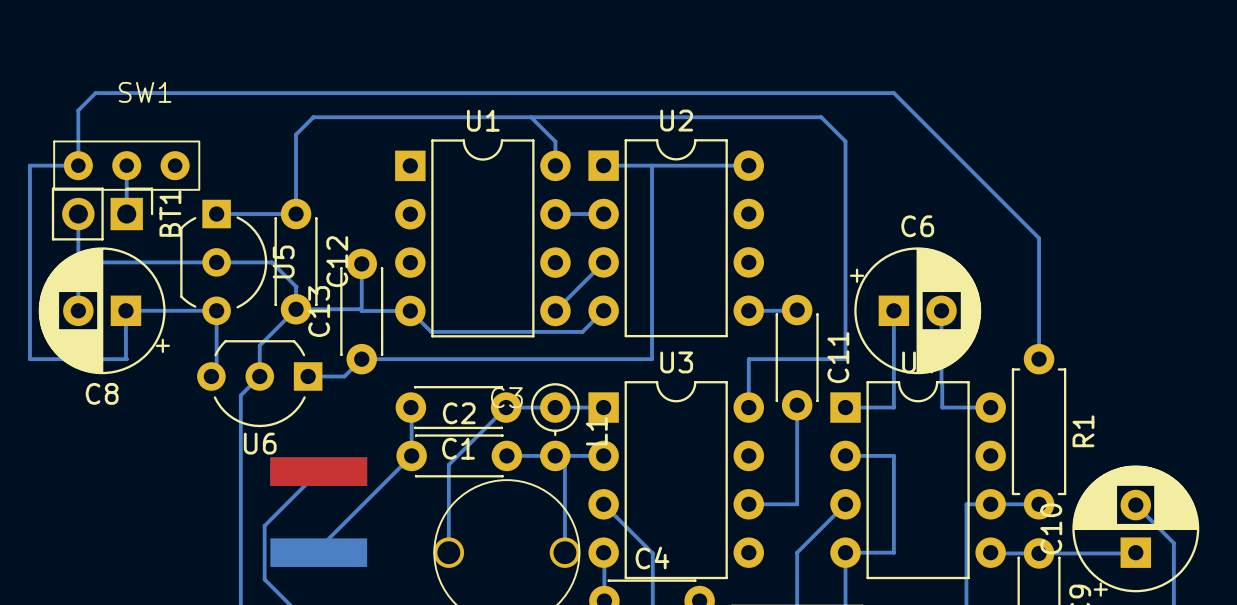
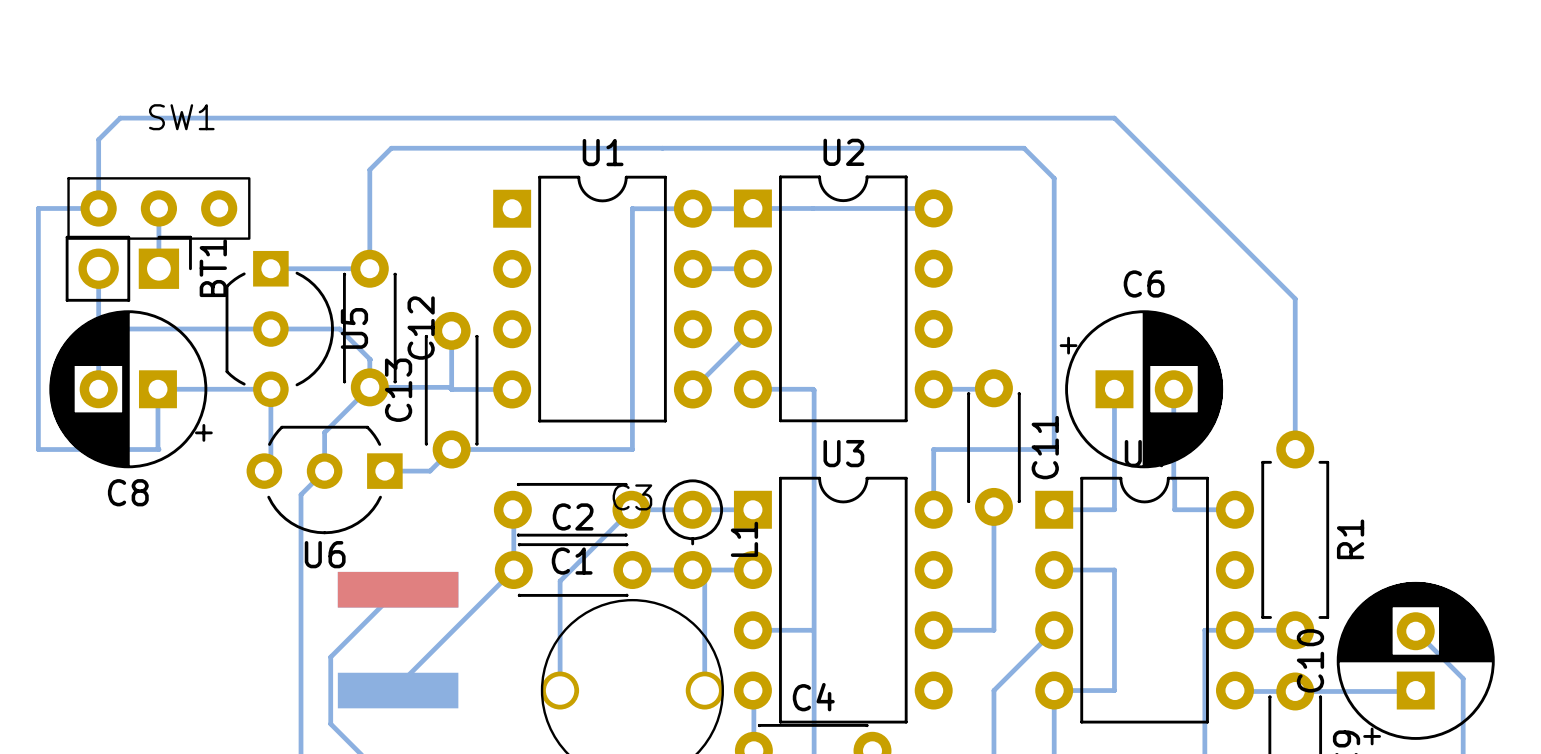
bottom track: (531, 117) (555, 141) (555, 165) -> none
bottom track: none -> (632, 208) (739, 208)
bottom track: (652, 165) (652, 359) (506, 359) -> (632, 208) (632, 449)
bottom track: (603, 310) (582, 331) (431, 331) (410, 310) -> (752, 389) (814, 390) (814, 691)
bottom track: (603, 504) (652, 553) -> (752, 630) (813, 630)

